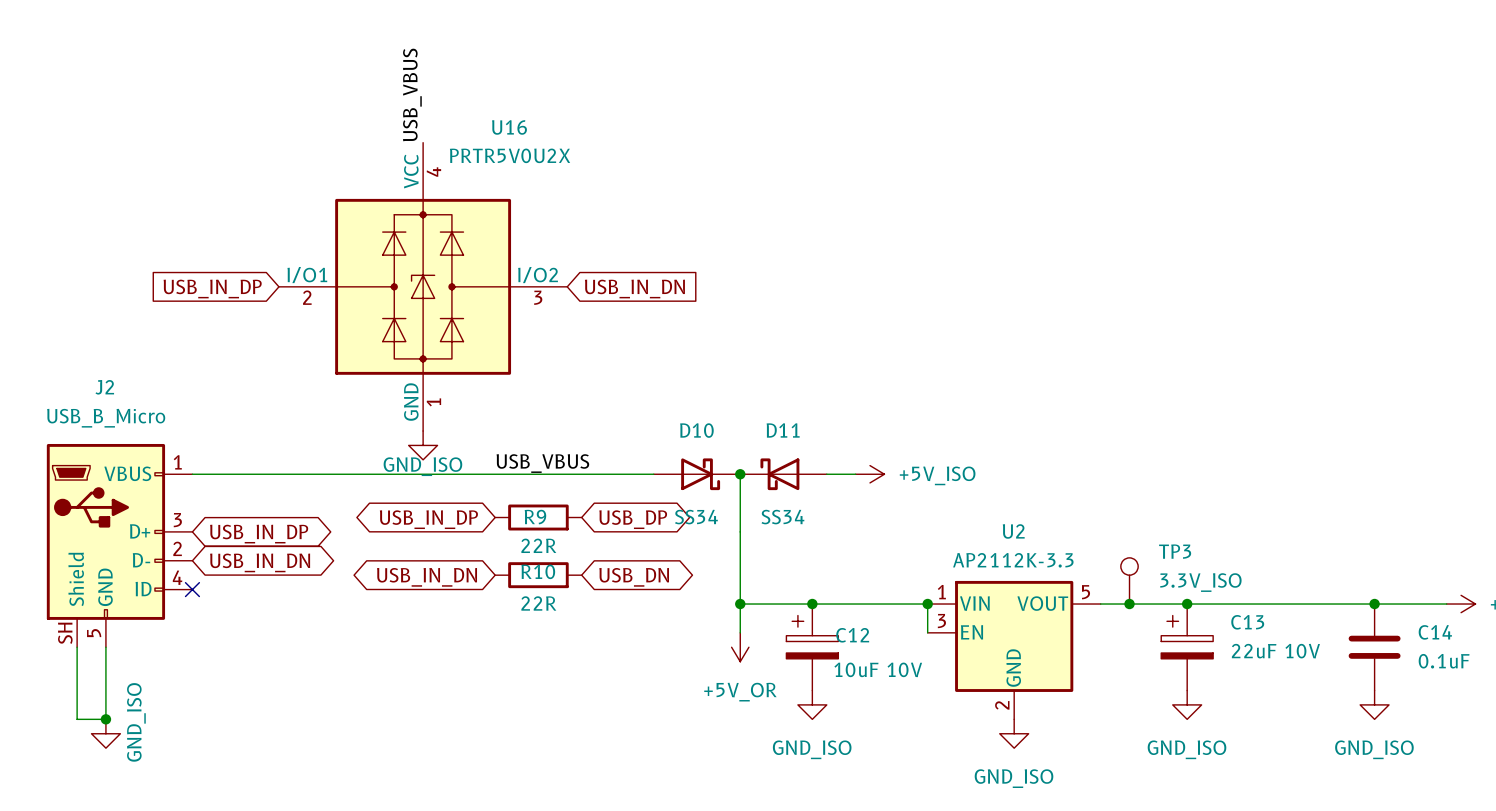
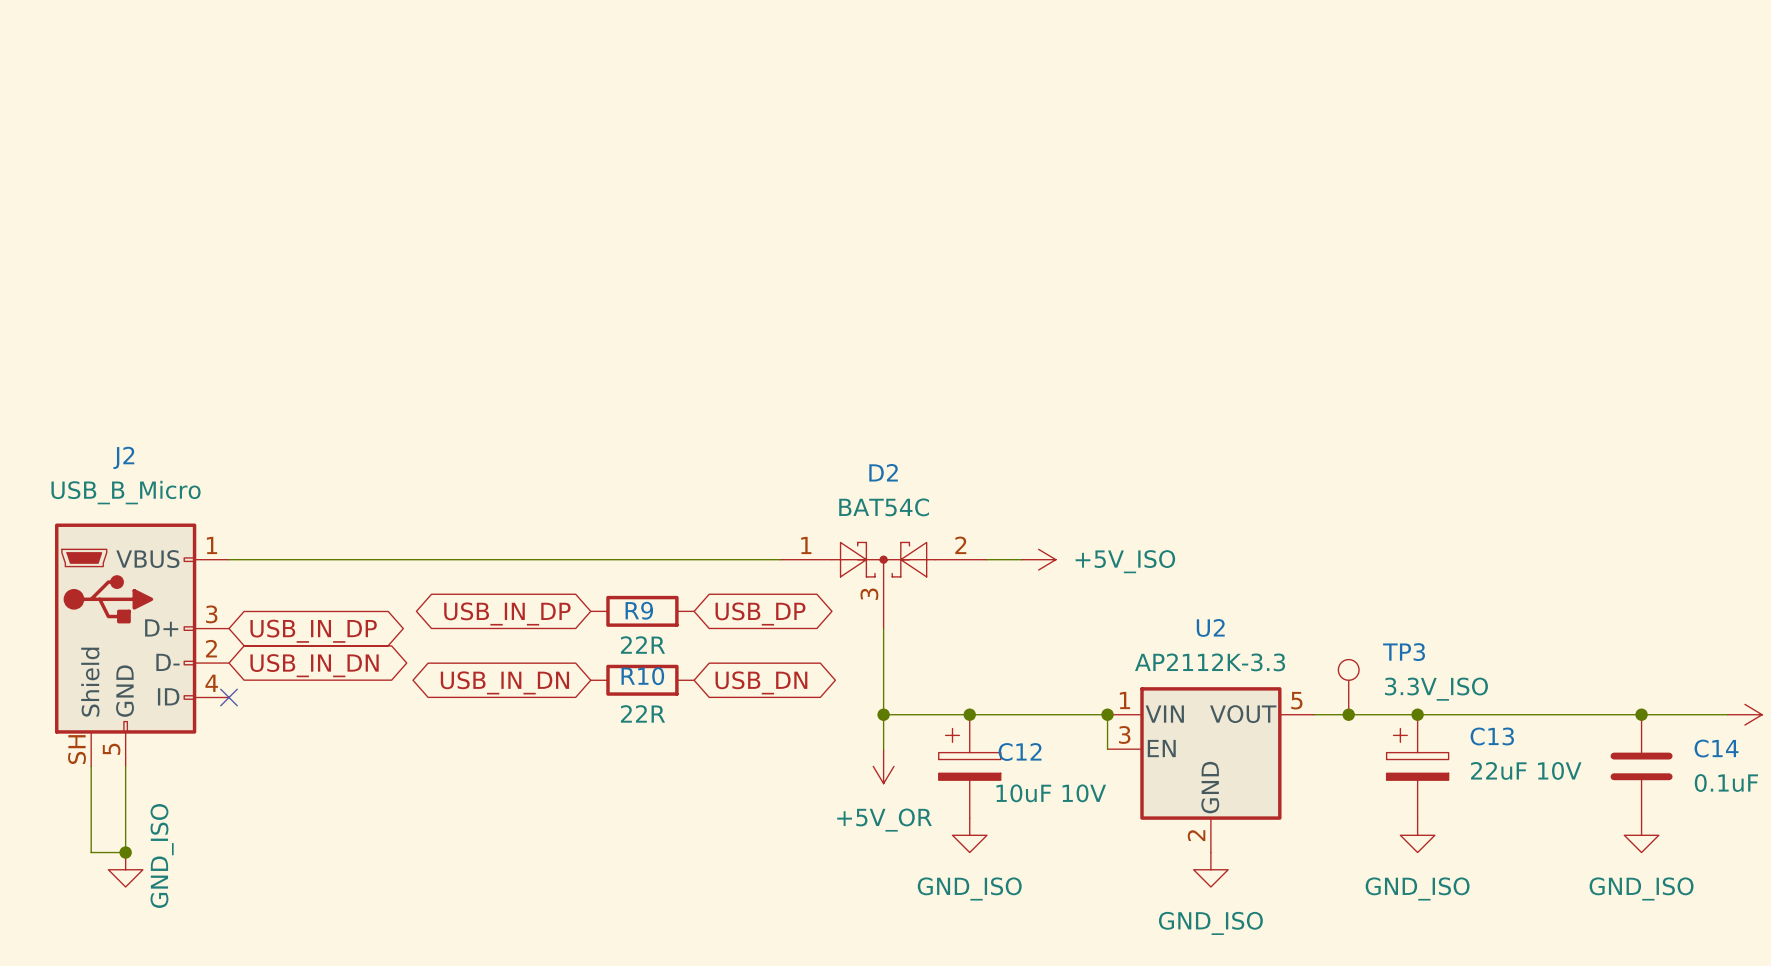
label: USB_VBUS (412, 94) -> none
U16: PRTR5V0U2X (423, 286) -> none
global label: USB_IN_DP (212, 289) -> none
global label: USB_IN_DN (634, 289) -> none
power symbol: GND_ISO (423, 445) -> none
label: USB_VBUS (542, 463) -> none
D10: SS34 (697, 474) -> none
junction: (740, 474) -> none
D11: SS34 (783, 474) -> none
D2: none -> BAT54C (883, 585)

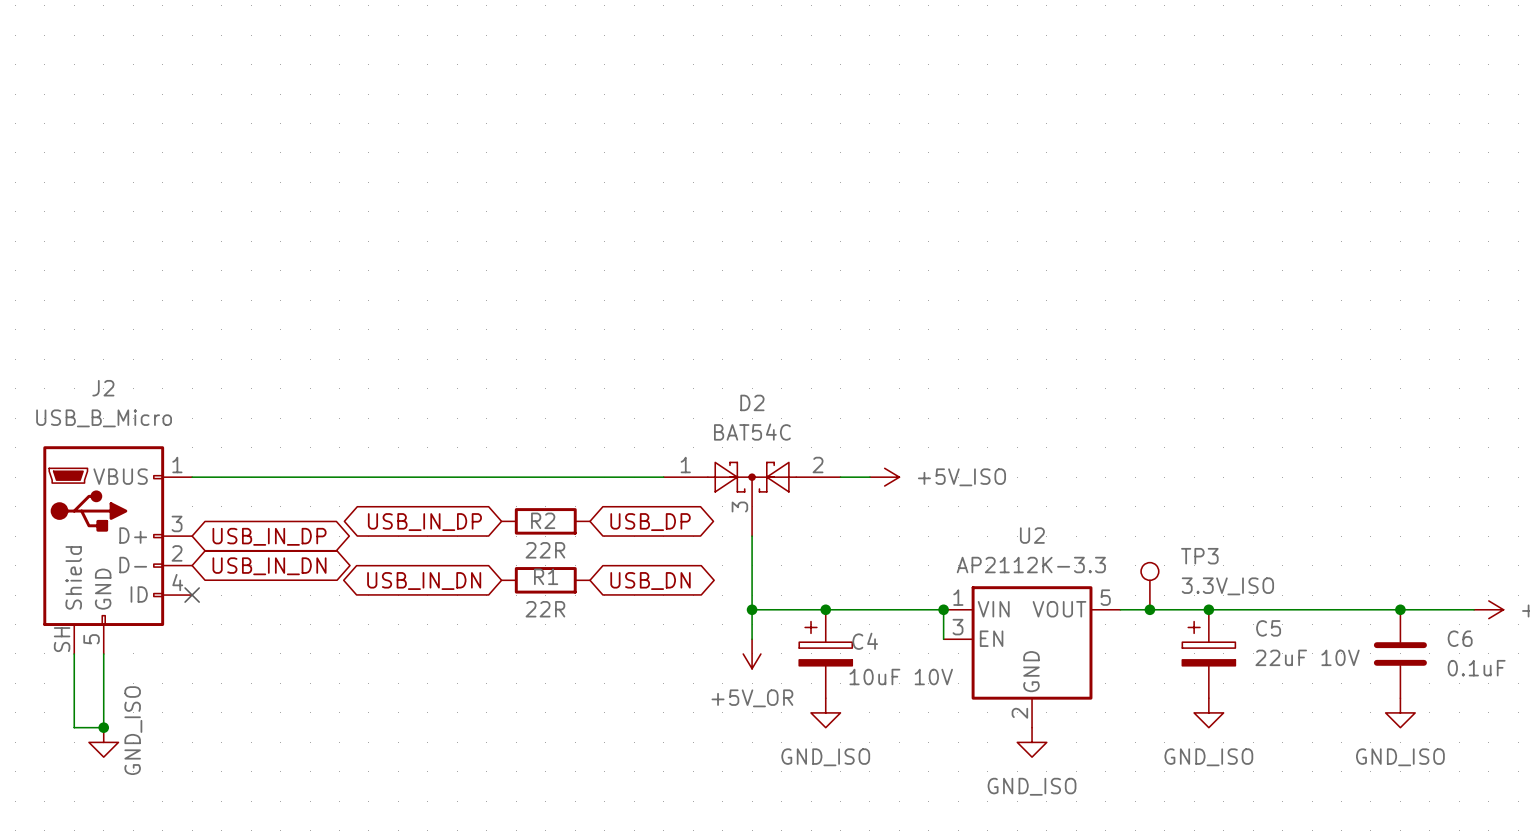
R9 name: R9 (639, 610) -> R2 (543, 520)
R10 name: R10 (642, 676) -> R1 (546, 576)
C13 name: C13 (1492, 736) -> C5 (1268, 628)
C14 name: C14 (1716, 748) -> C6 (1460, 638)
C12 name: C12 (1020, 751) -> C4 (865, 641)

